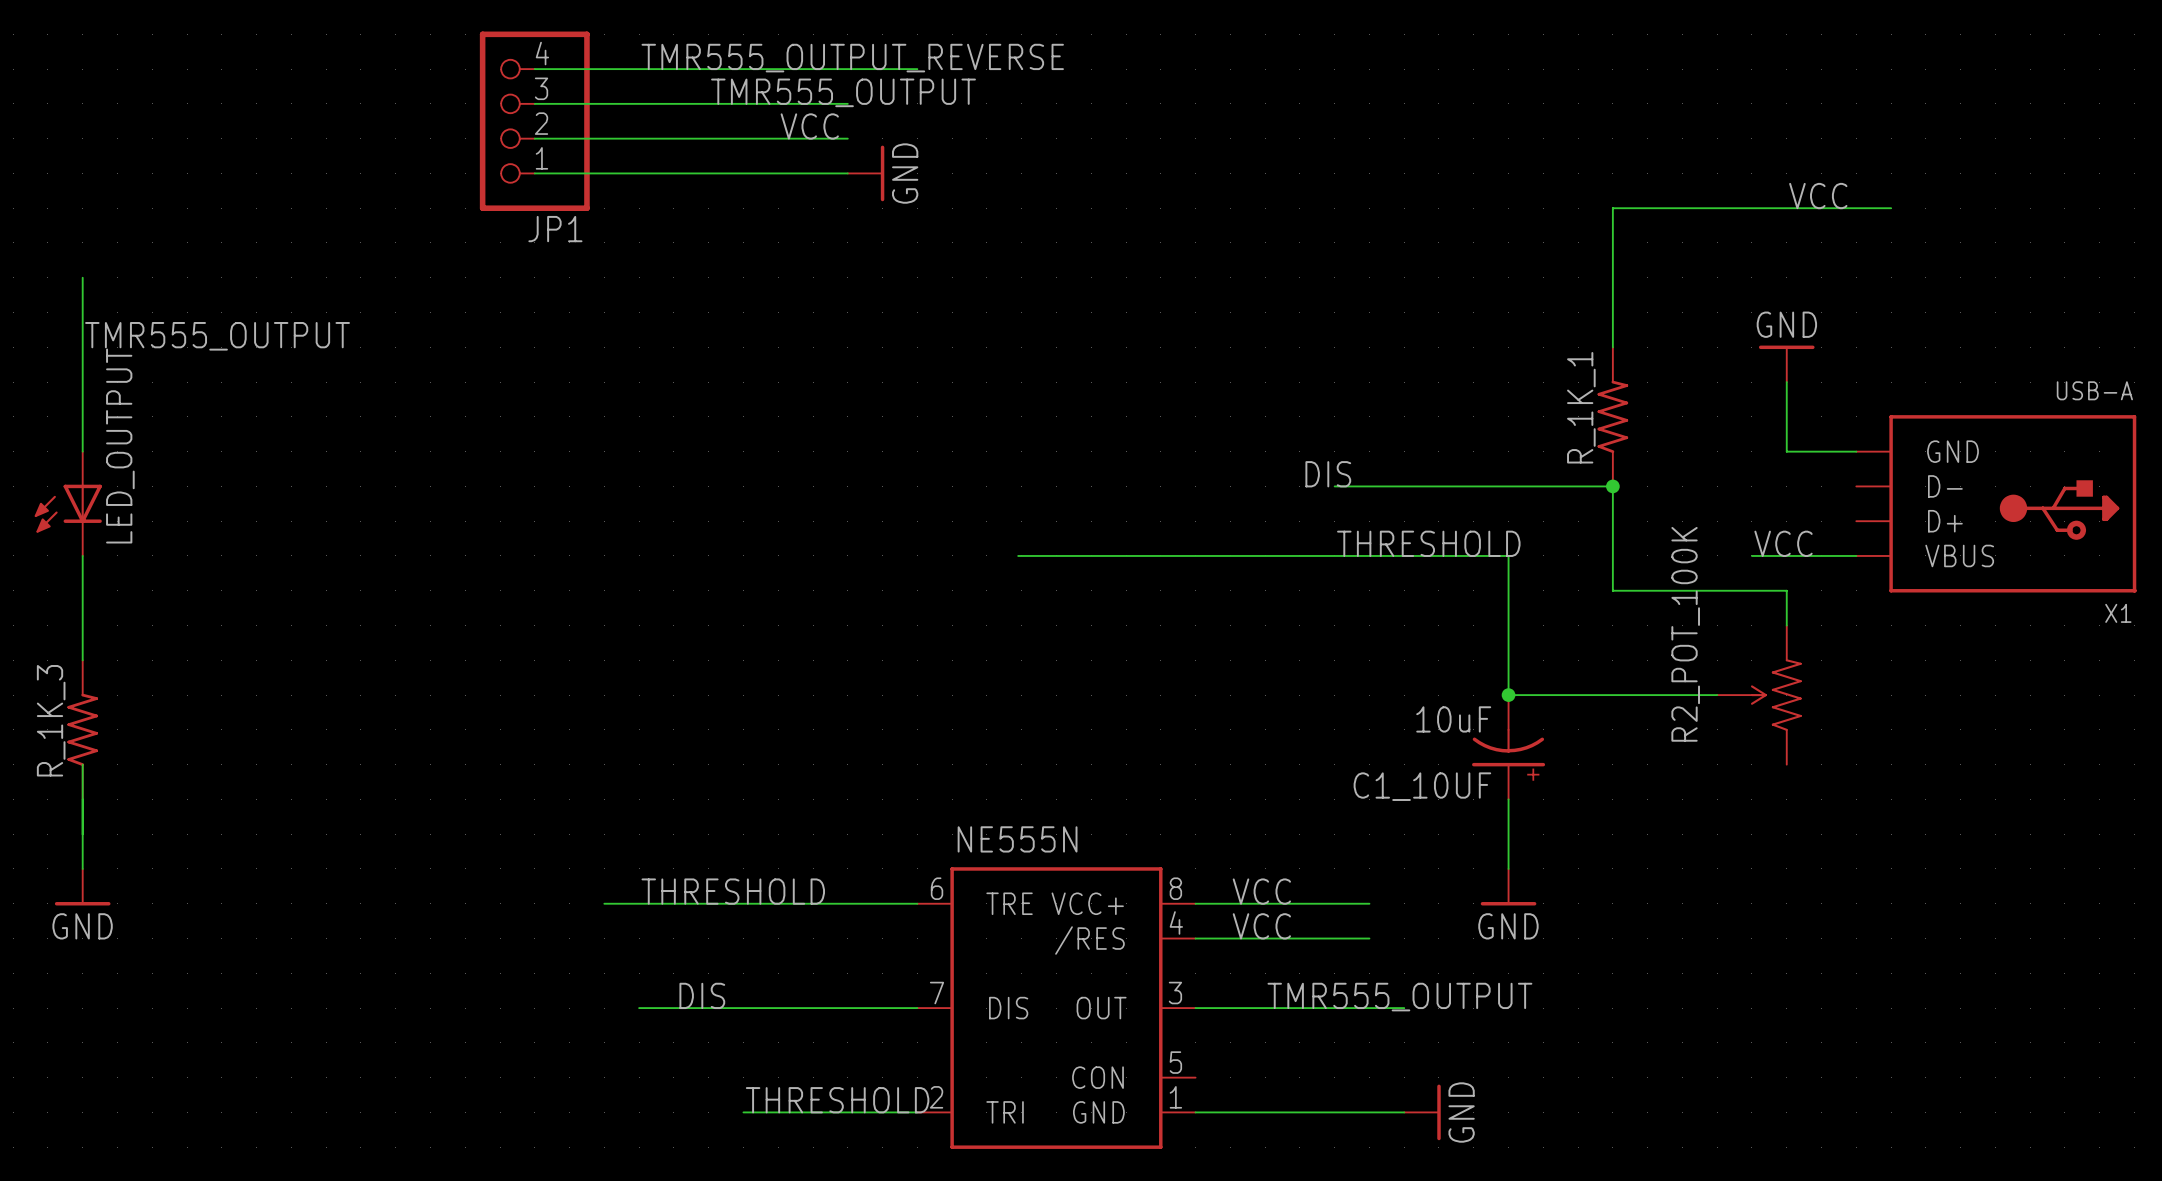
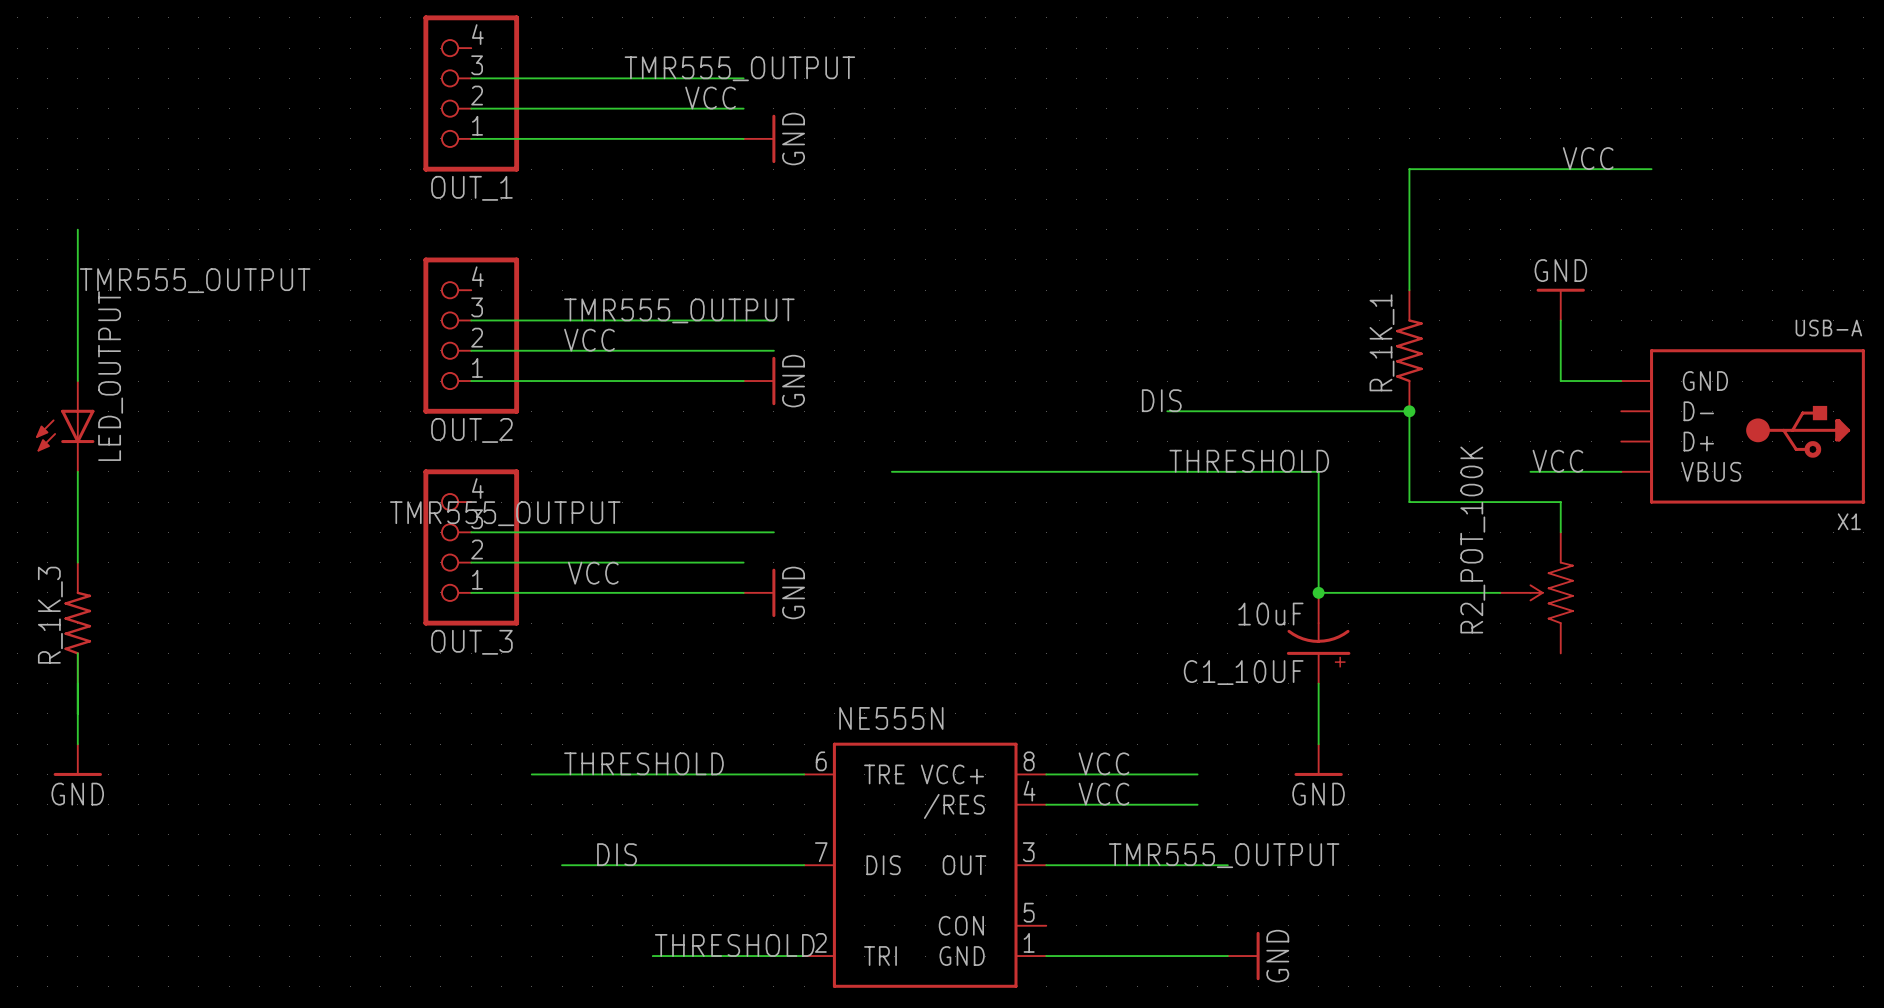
label: TMR555_OUTPUT_REVERSE (852, 58) -> none
wire: (534, 69) (917, 69) -> none
JP1 name: JP1 (555, 229) -> OUT_1 (471, 188)
label: none -> TMR555_OUTPUT (679, 310)
wire: none -> (471, 320) (773, 320)
OUT_2: none -> (471, 335)
label: none -> VCC (589, 340)
wire: none -> (471, 350) (773, 350)
wire: none -> (471, 381) (743, 381)
power symbol: none -> GND (759, 381)
label: none -> TMR555_OUTPUT (505, 513)
wire: none -> (471, 532) (773, 532)
OUT_3: none -> (471, 547)
wire: none -> (471, 562) (743, 562)
label: none -> VCC (593, 573)
wire: none -> (471, 592) (743, 592)
power symbol: none -> GND (759, 592)

